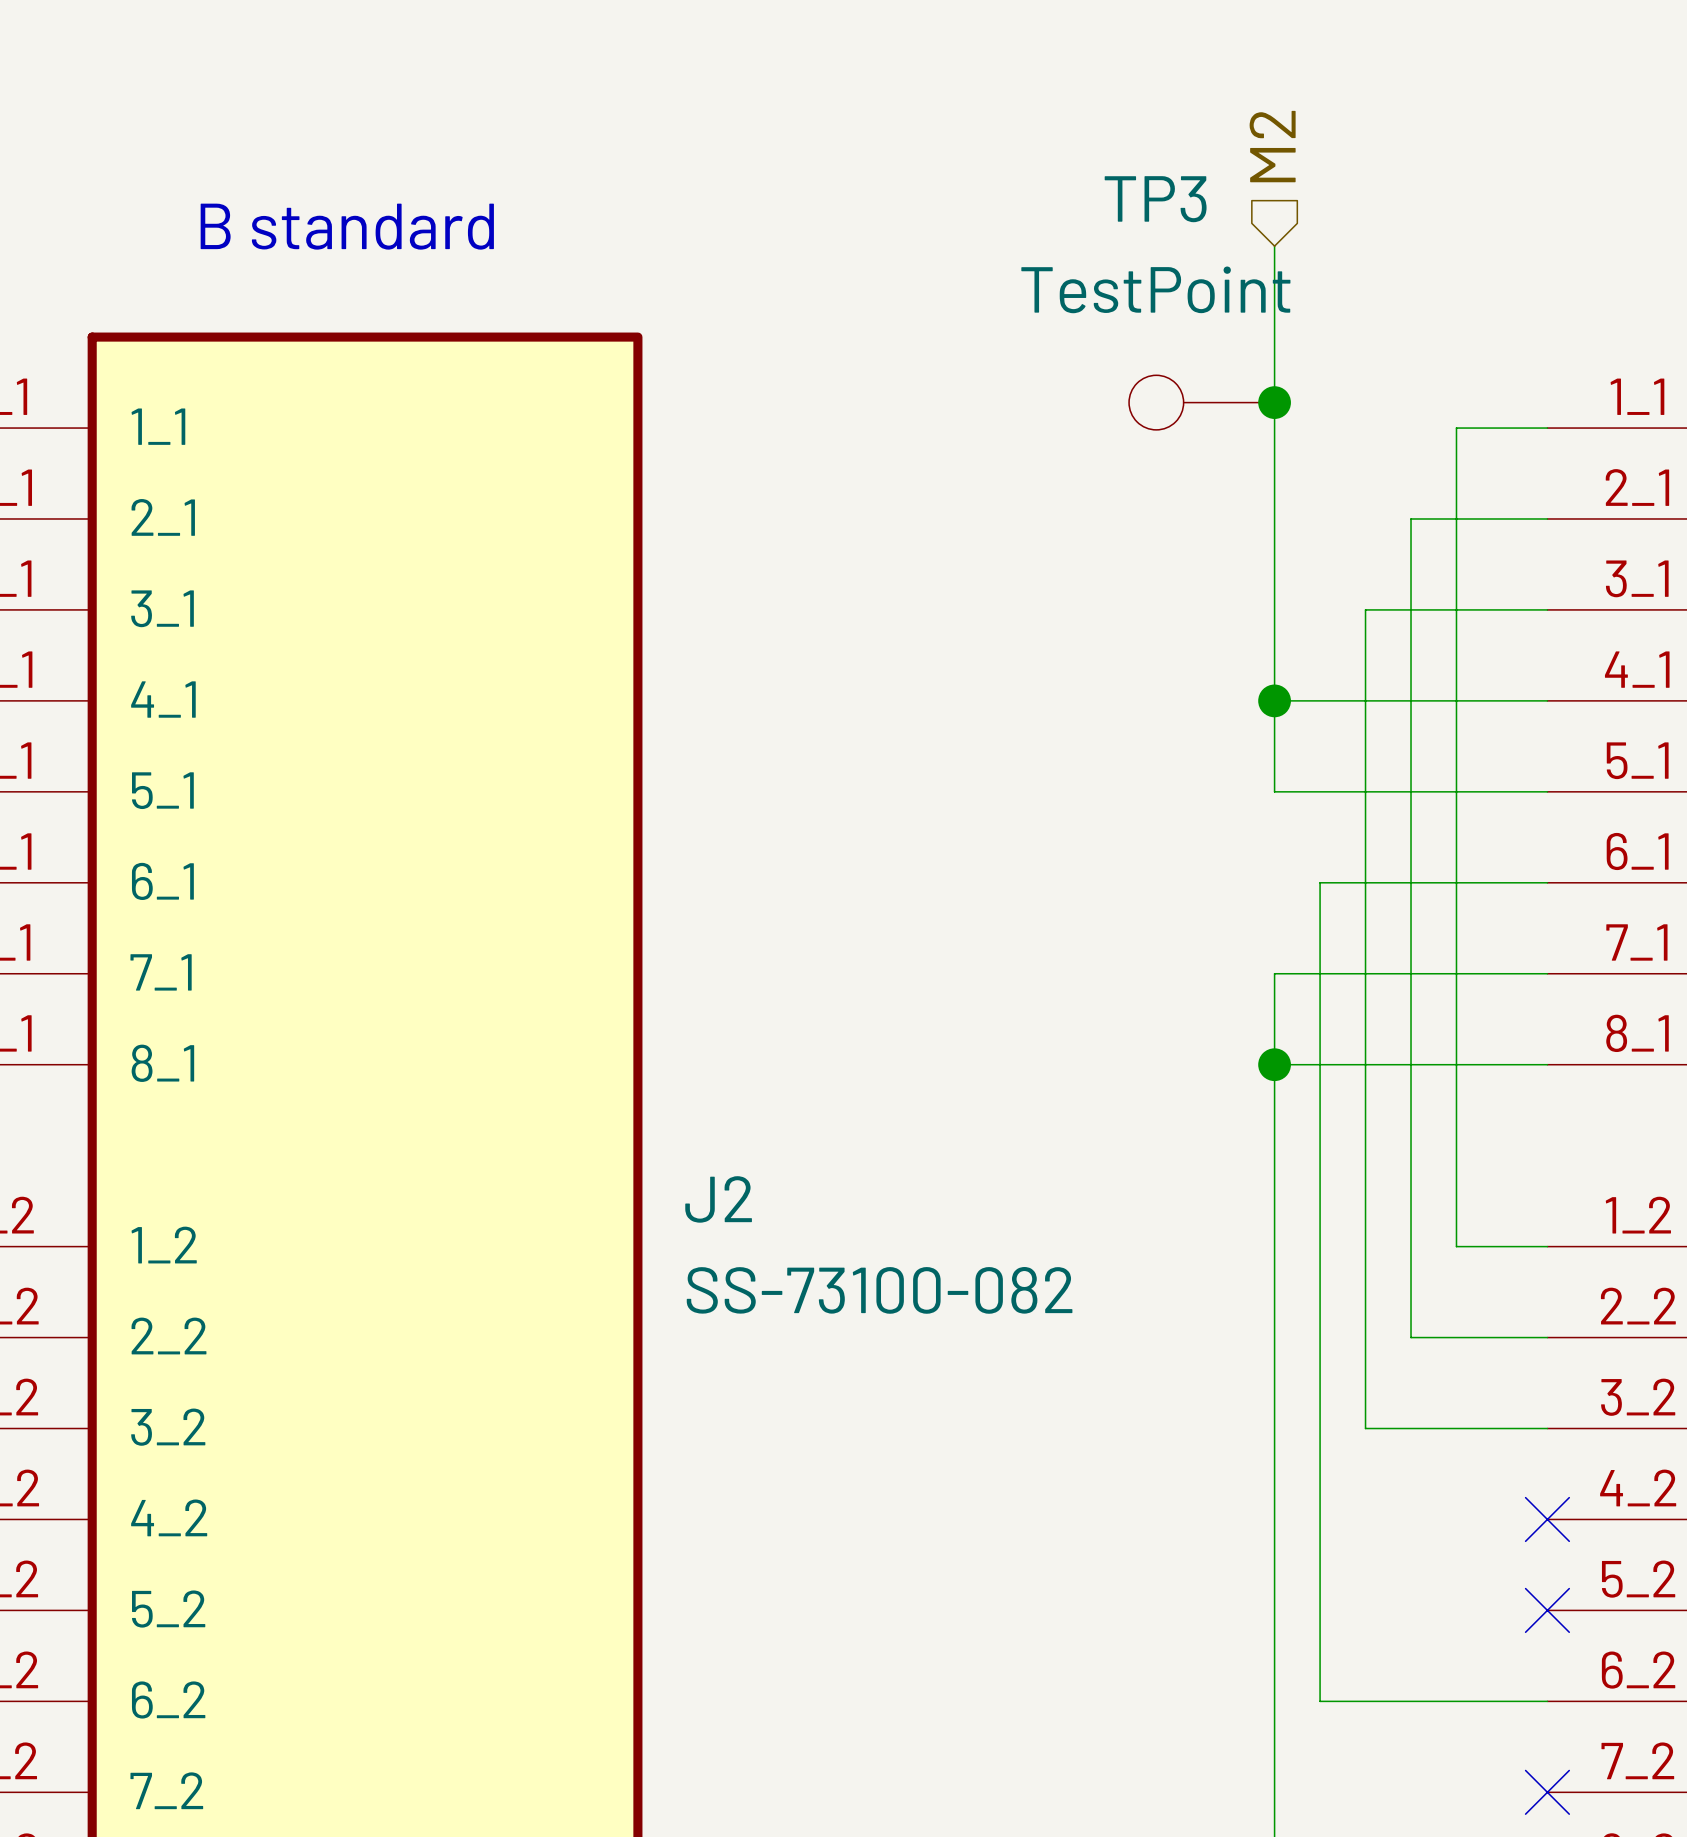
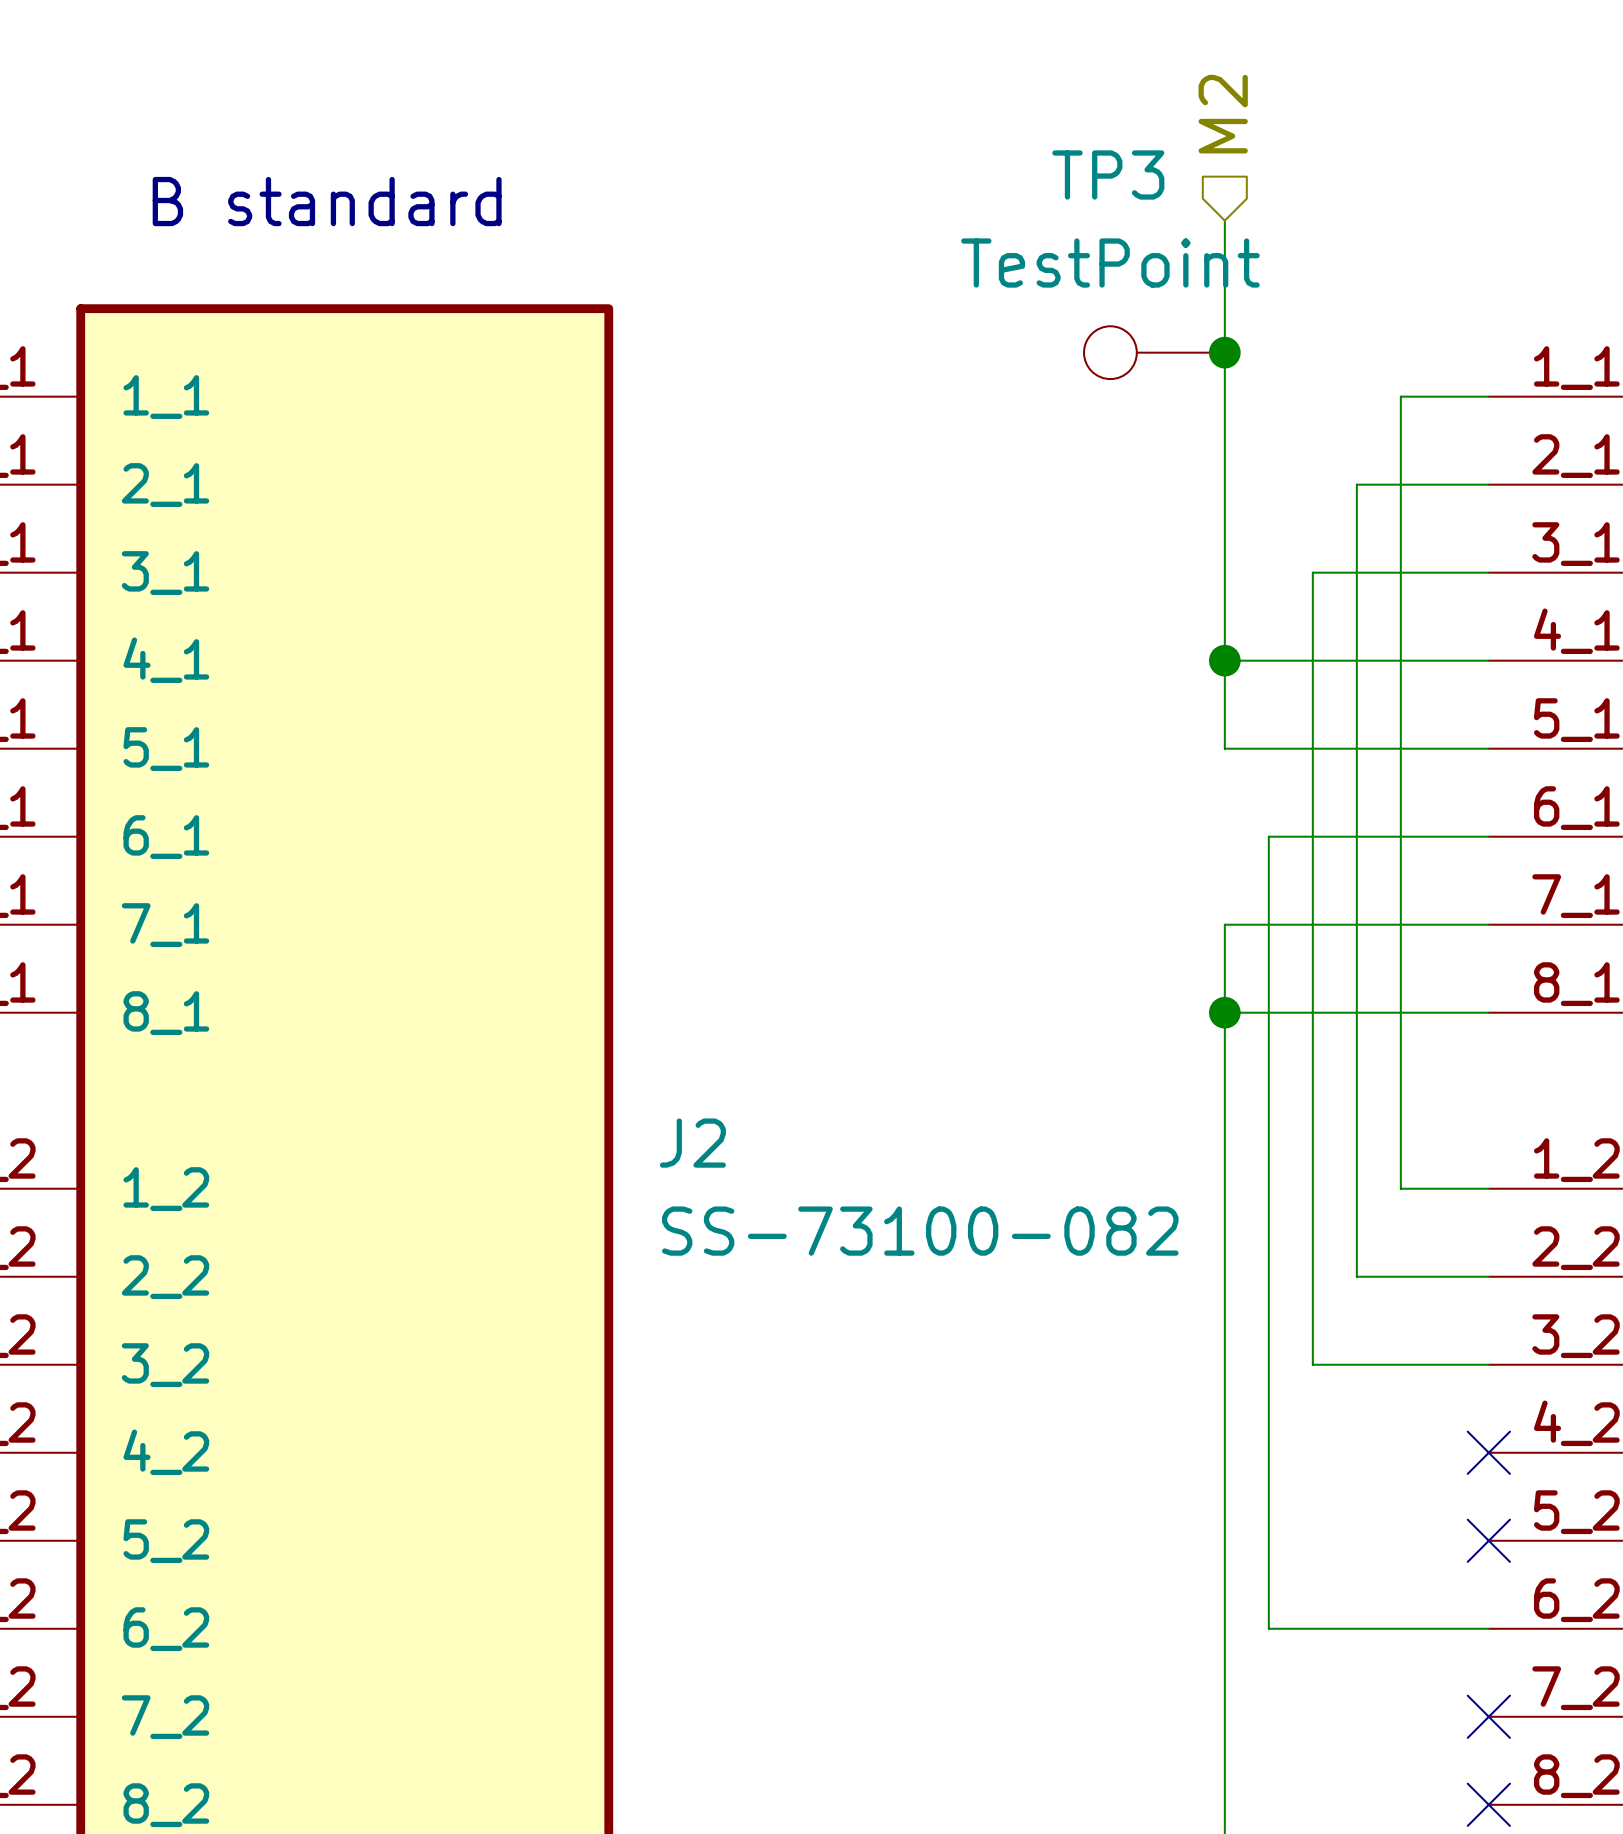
TP3 position: (1201, 402) -> (1154, 352)
junction position: (1274, 402) -> (1224, 352)

